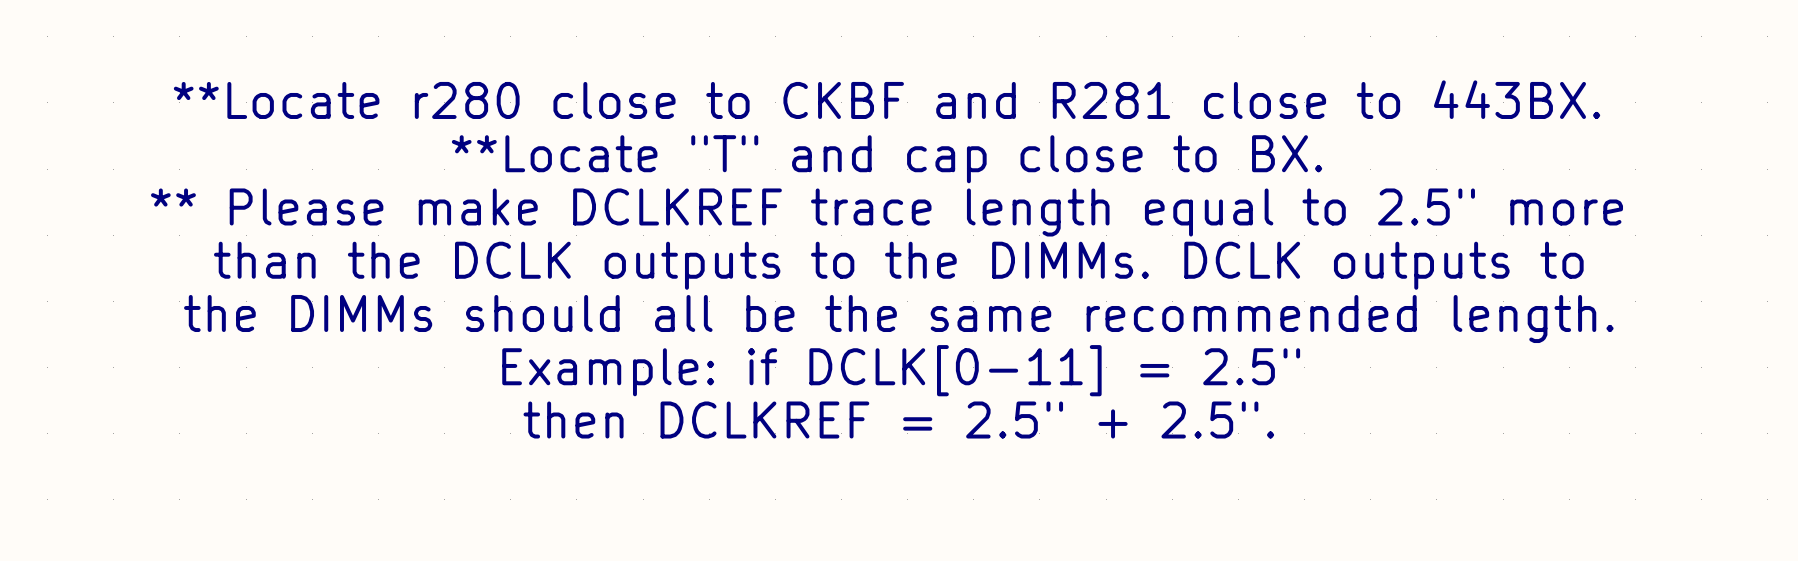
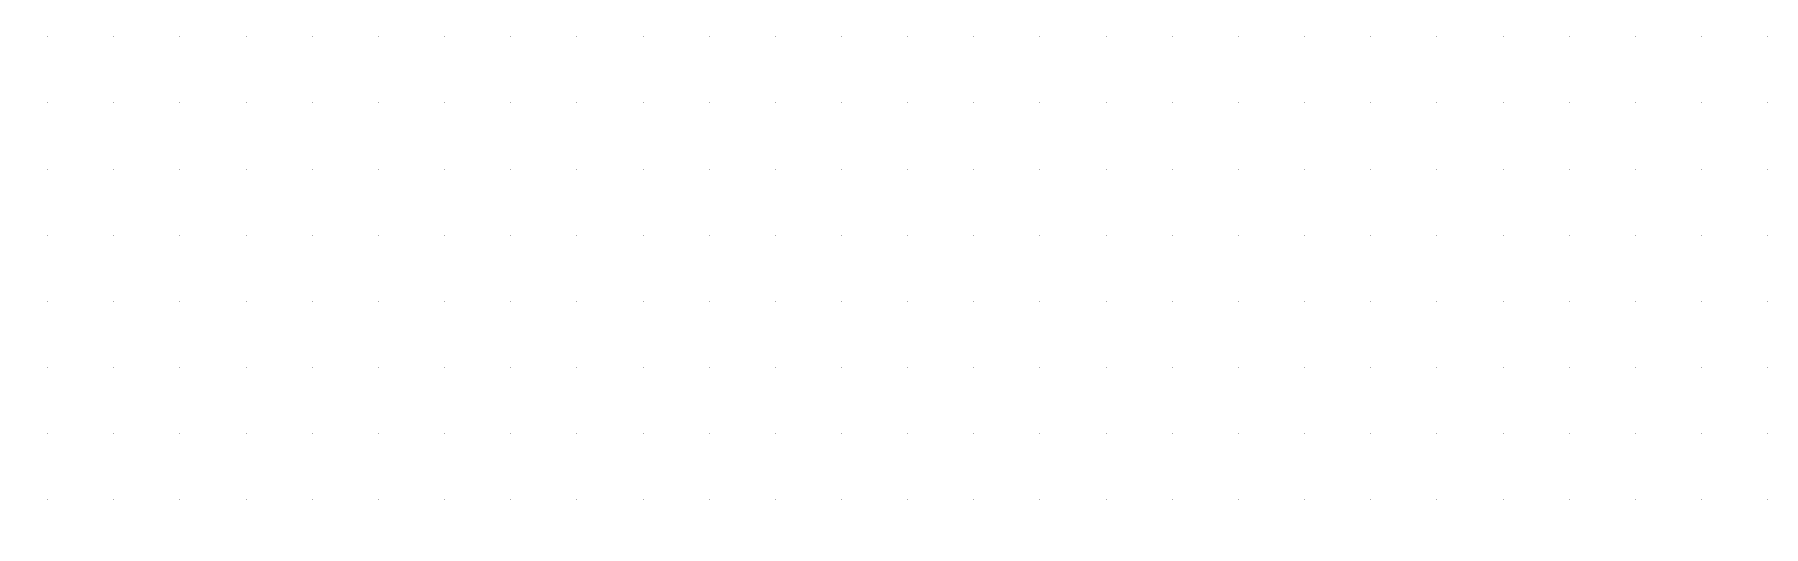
text: **Locate r280 close to CKBF and R281 close to 443BX. (887, 99) -> none
text: **Locate "T" and cap close to BX. (887, 159) -> none
text: ** Please make DCLKREF trace length equal to 2.5" more (887, 212) -> none
text: than the DCLK outputs to the DIMMs. DCLK outputs to (898, 265) -> none
text: the DIMMs should all be the same recommended length. (898, 318) -> none
text: Example: if DCLK[0-11] = 2.5" (901, 370) -> none
text: then DCLKREF = 2.5" + 2.5". (898, 420) -> none

